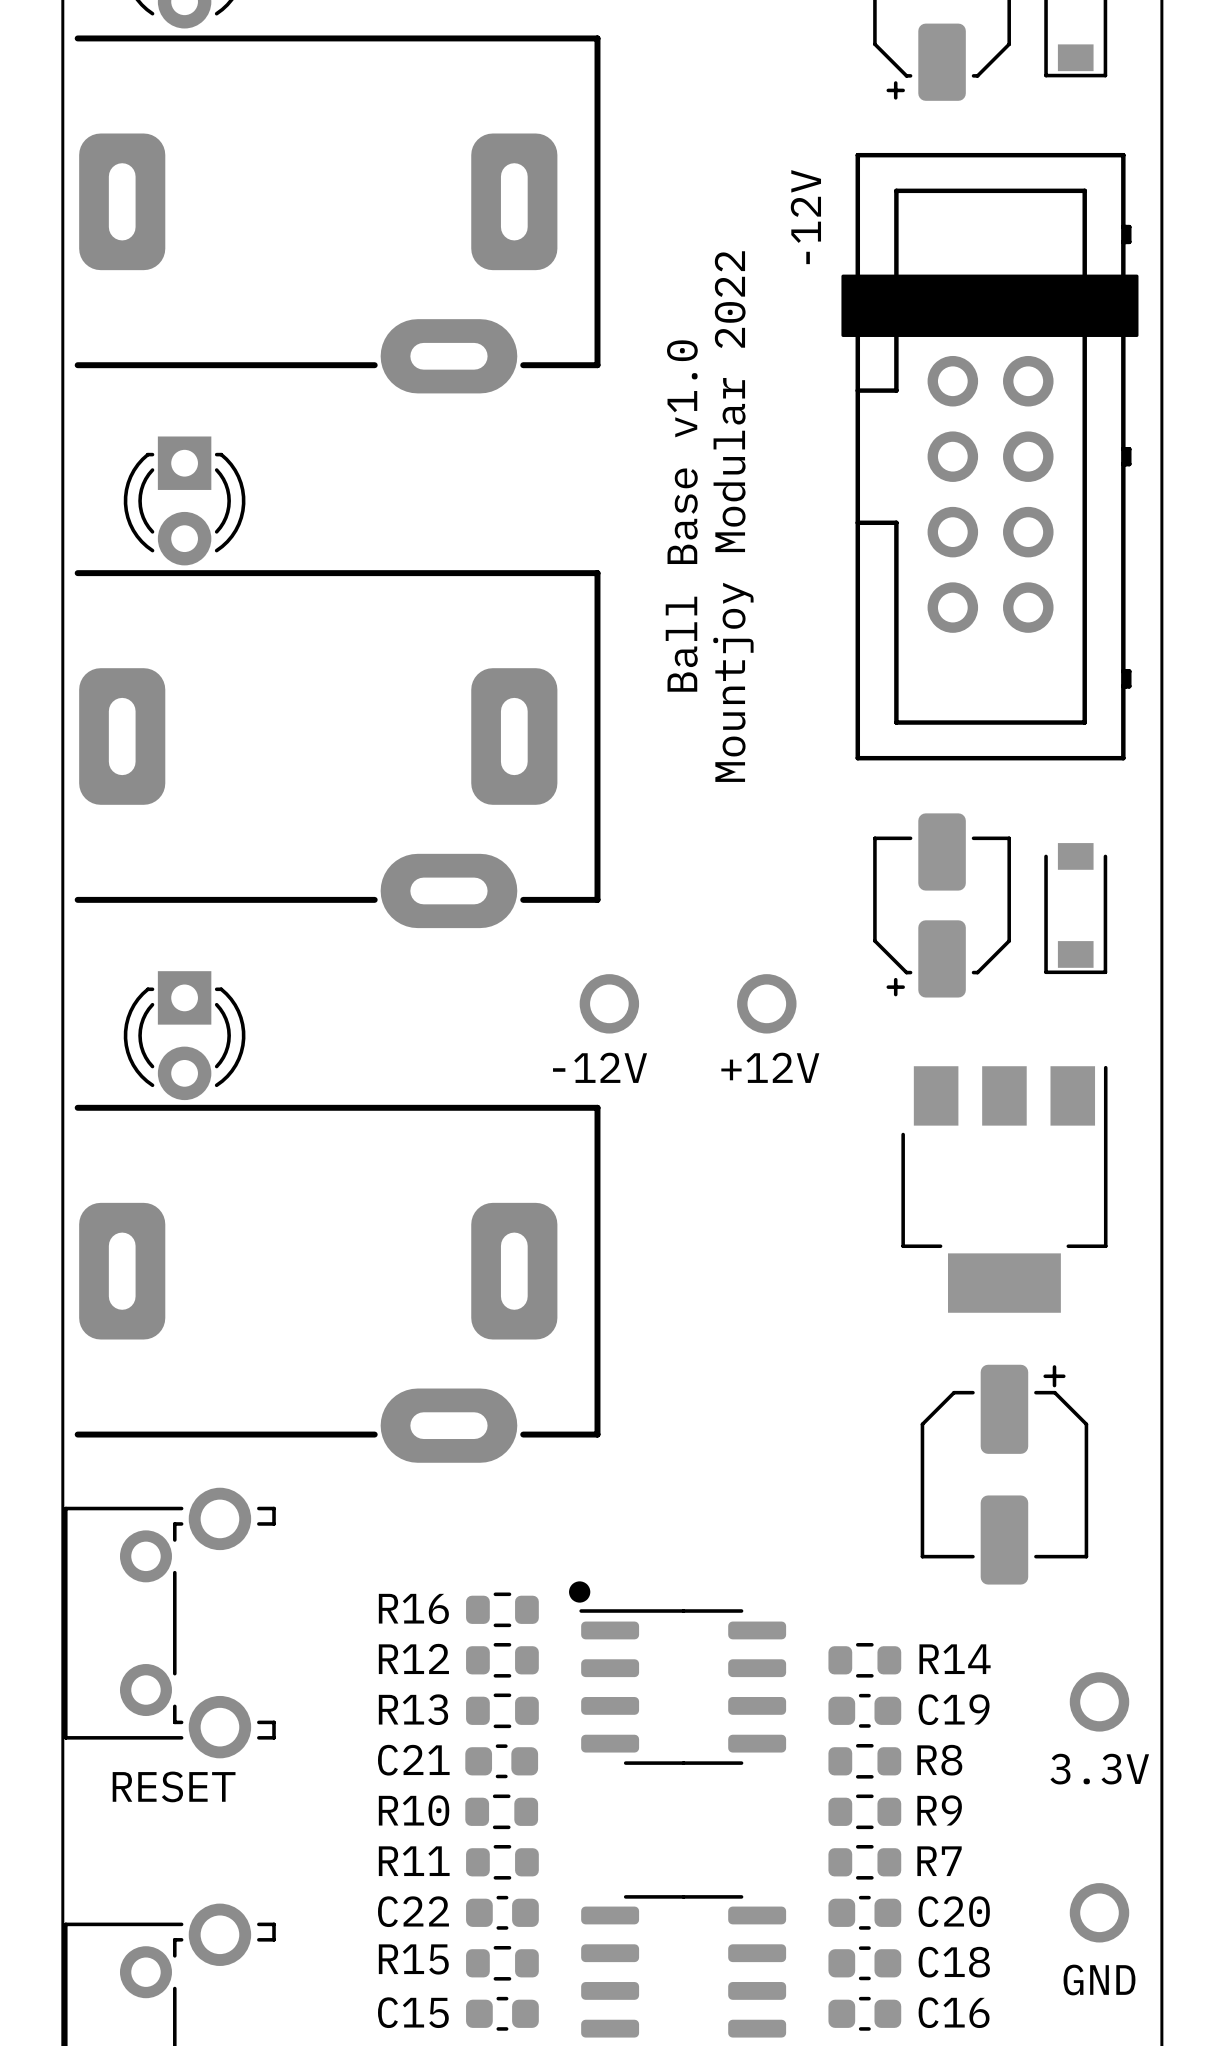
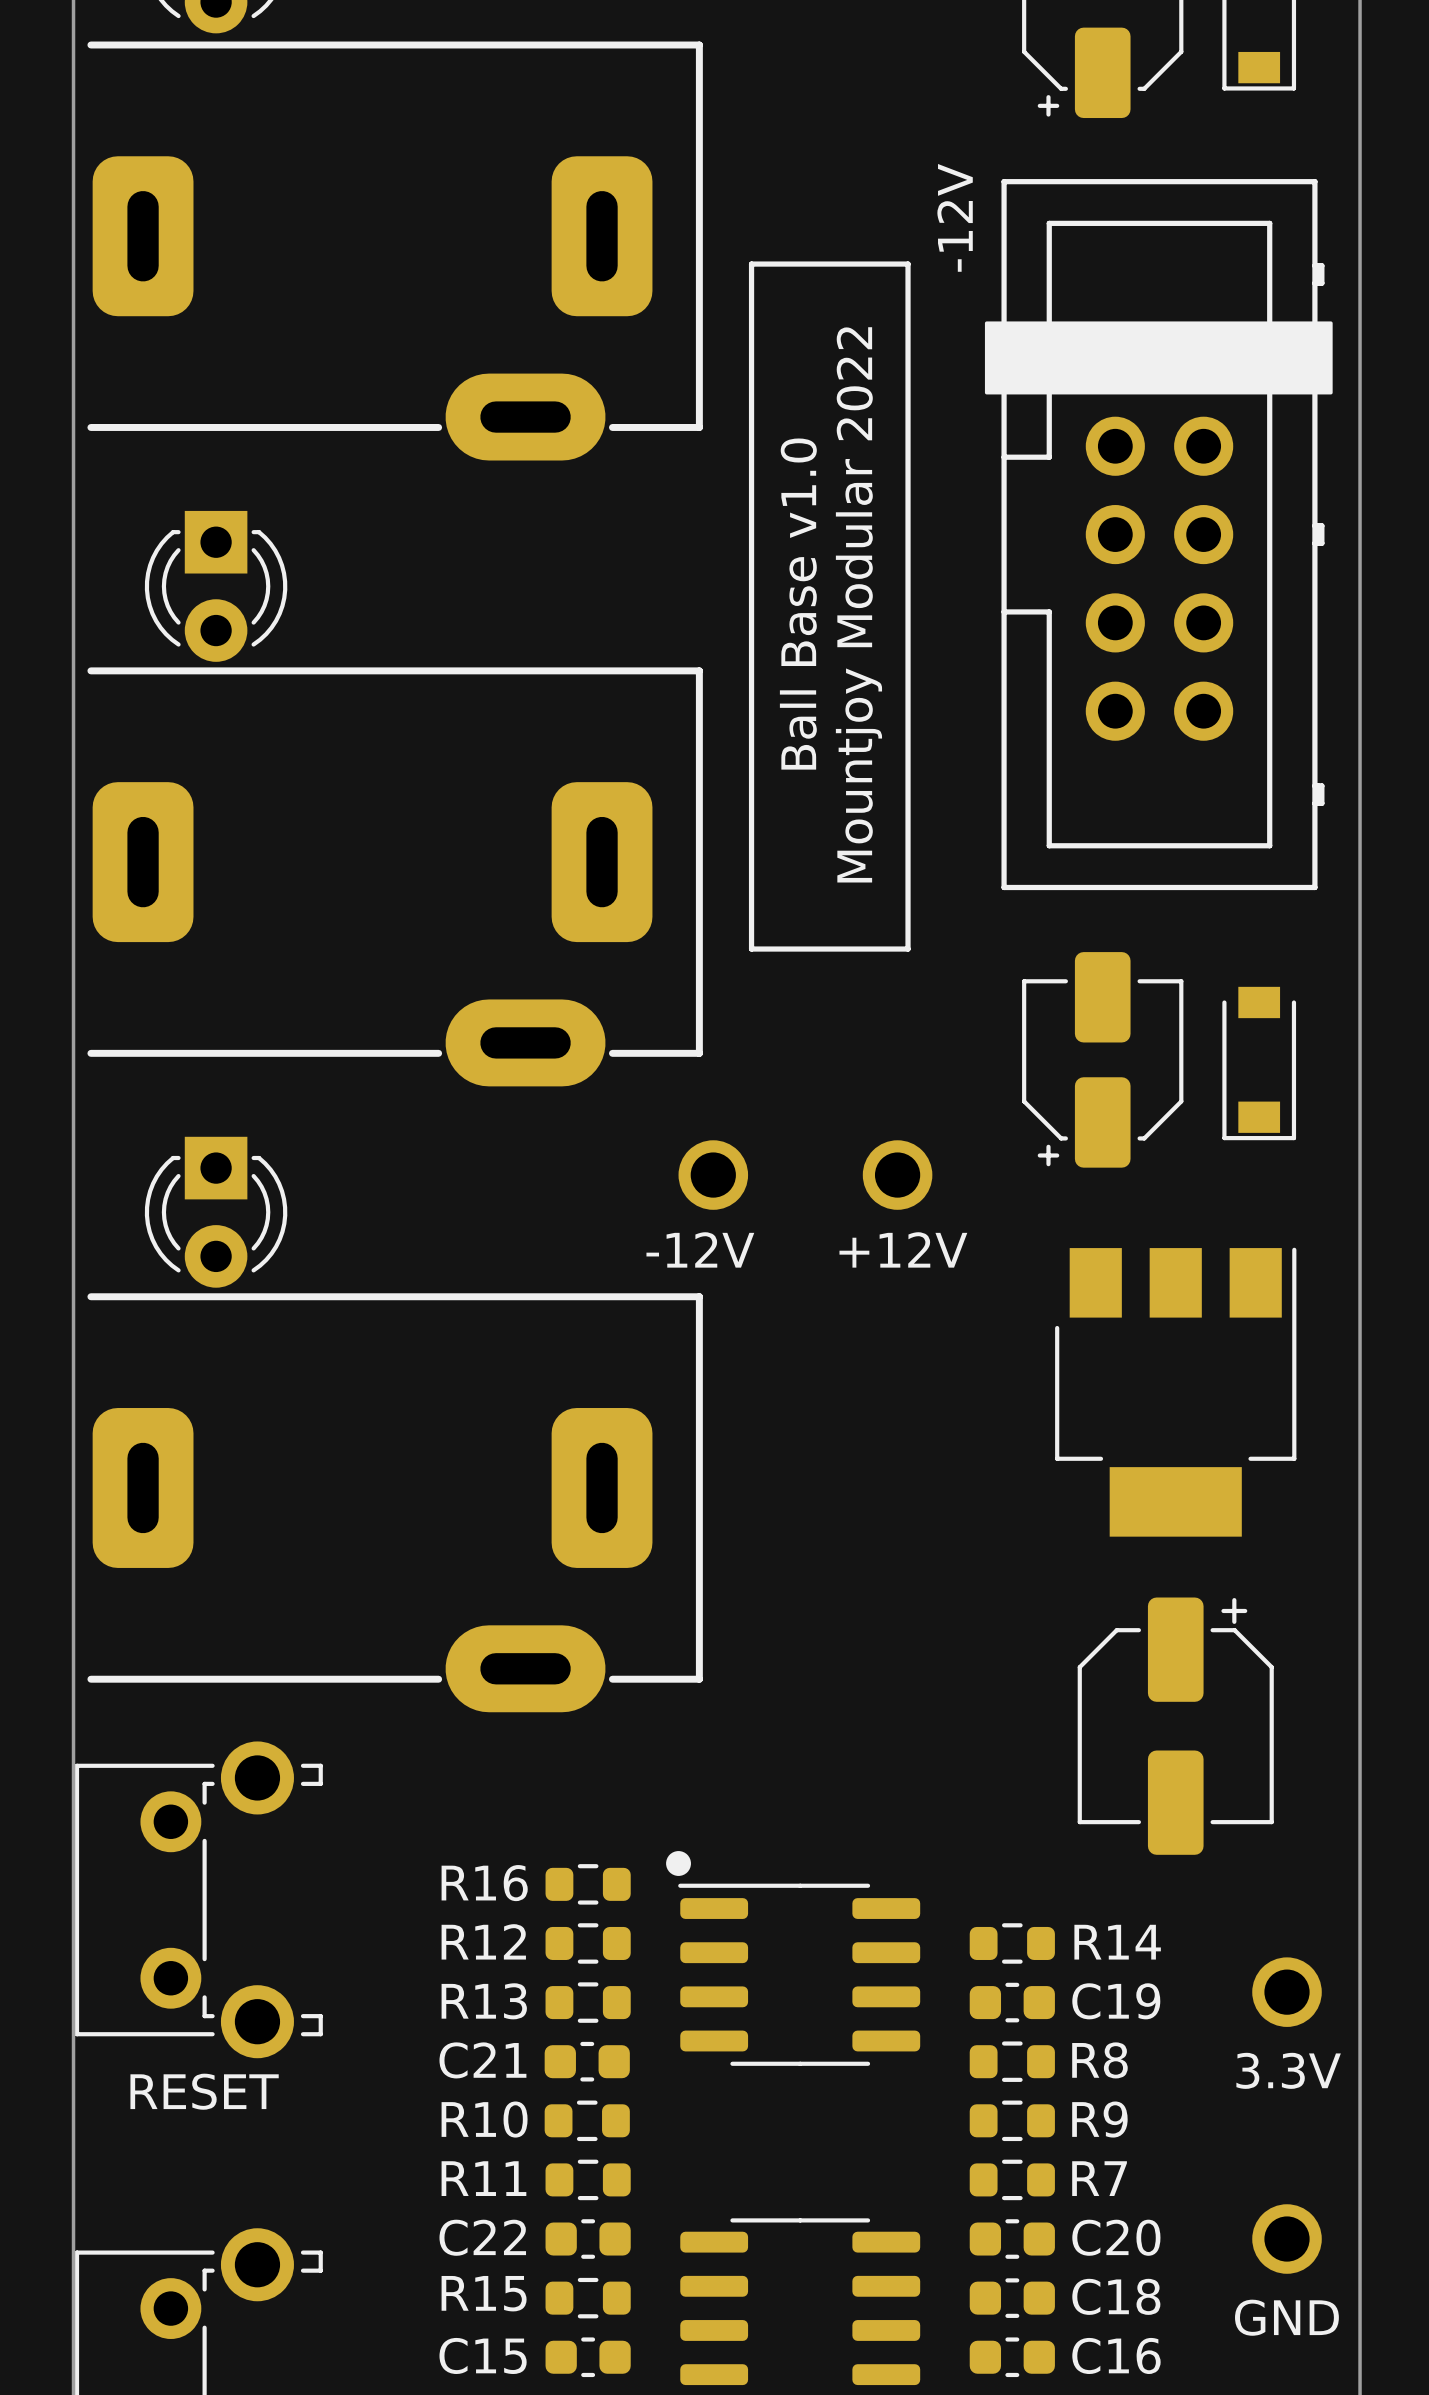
part text position: -12V (805, 217) -> -12V (955, 217)
line: none -> (751, 264) (908, 264) (908, 949) (751, 949) (751, 264)

